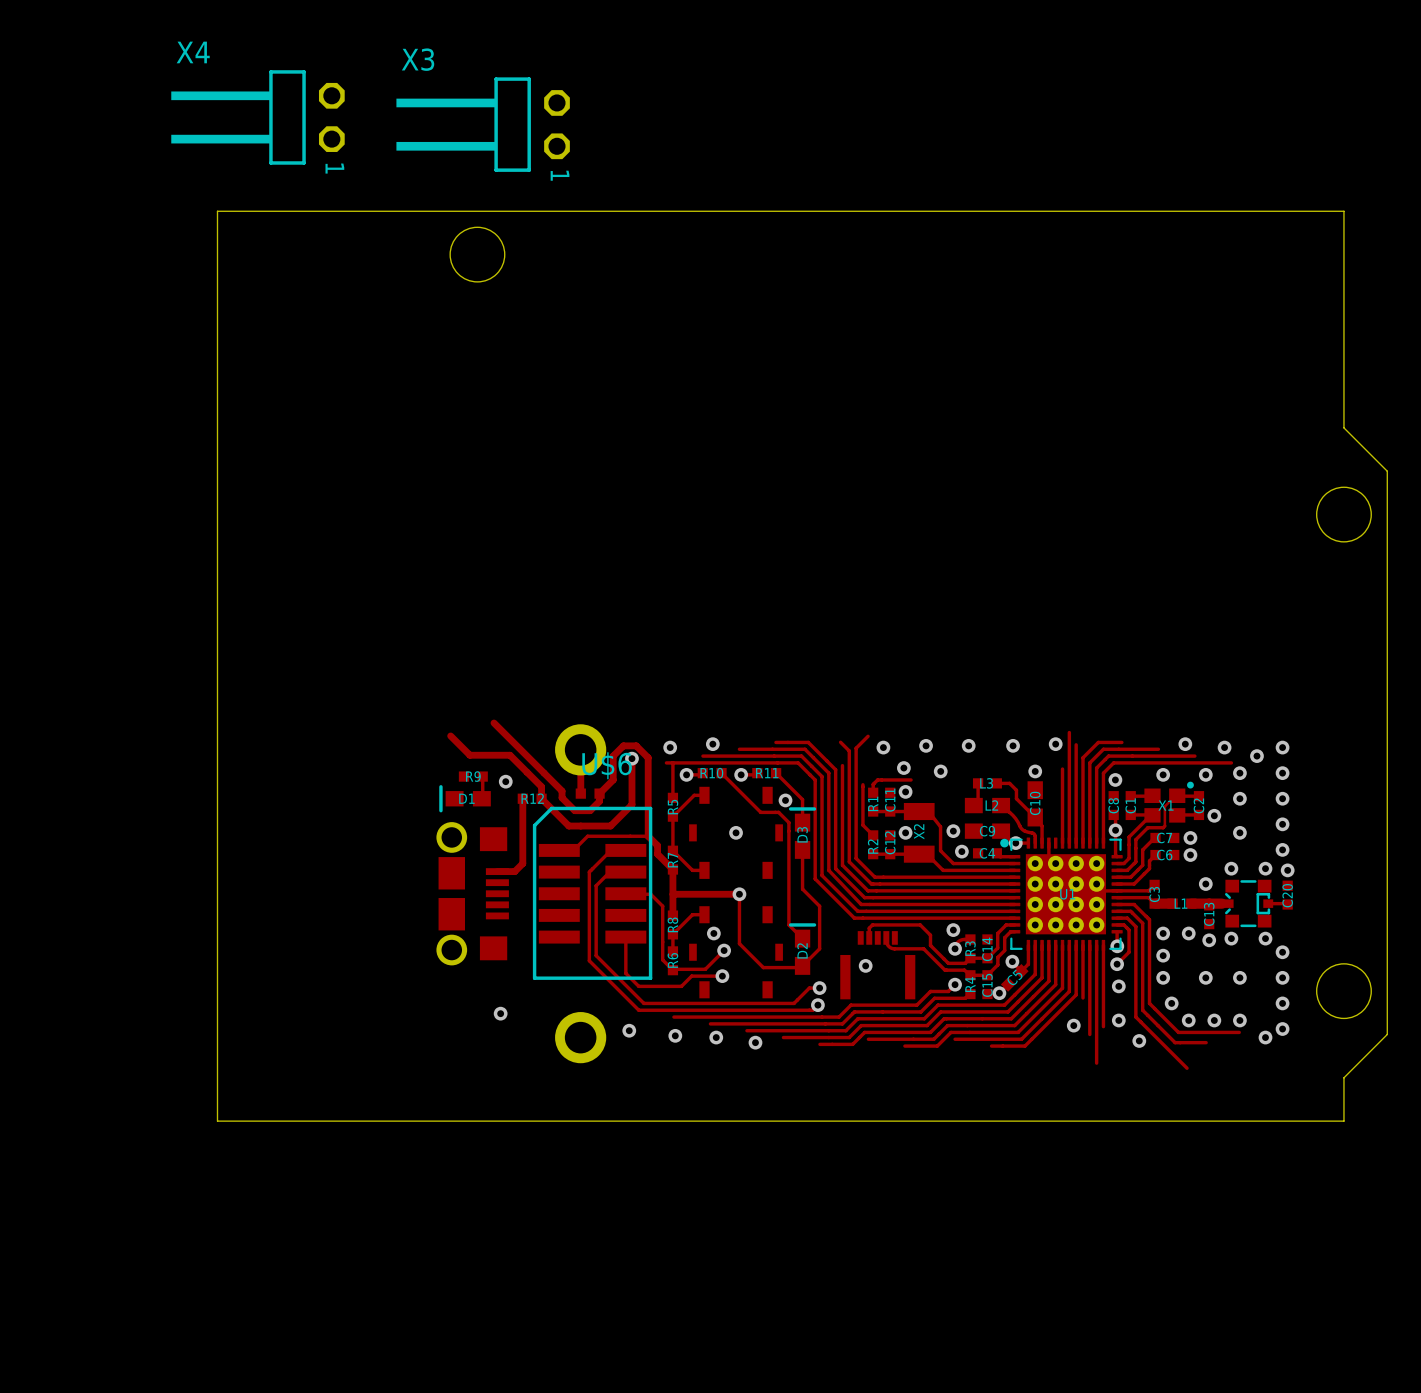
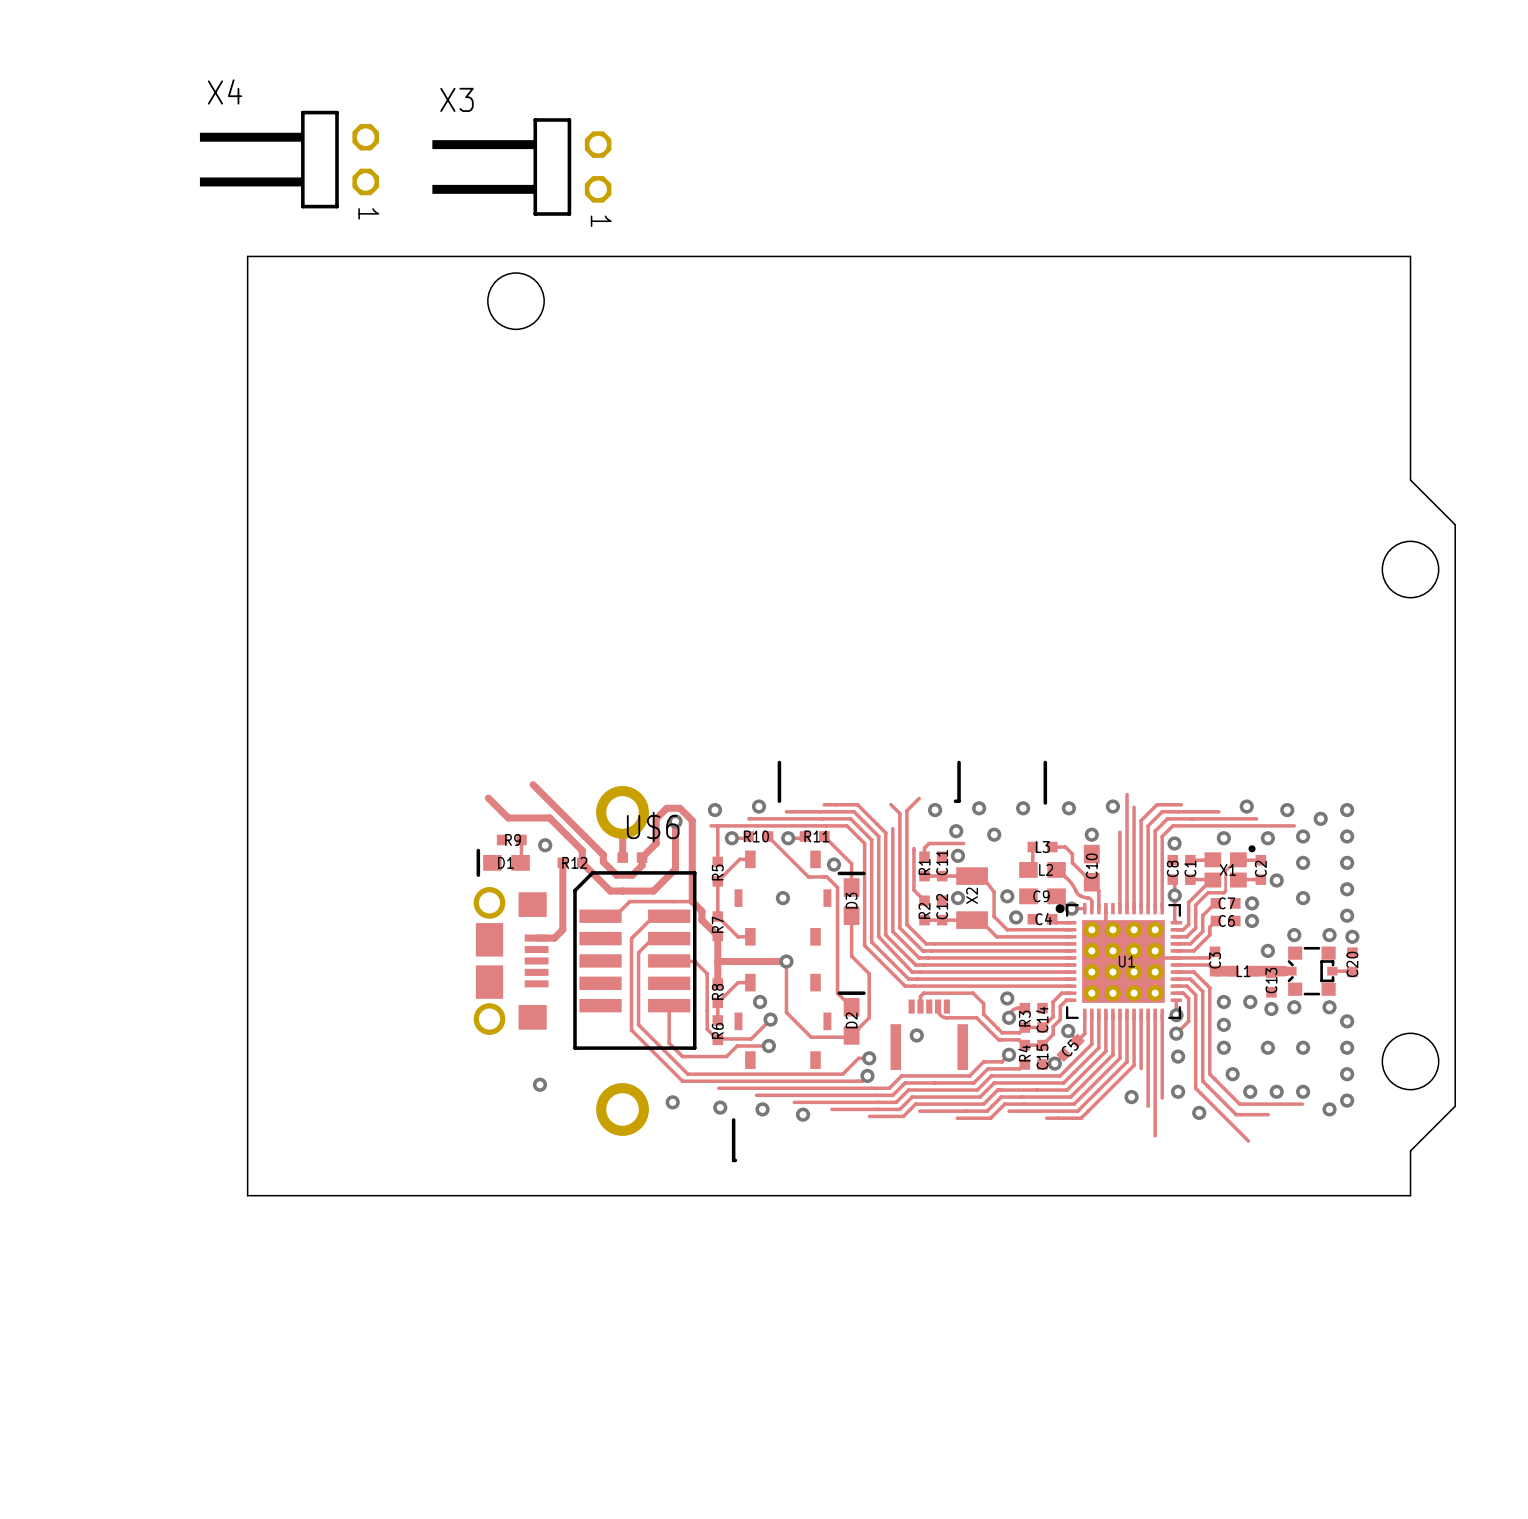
line: none -> (779, 762) (779, 801)
line: none -> (959, 762) (959, 801) (955, 801)
line: none -> (1045, 762) (1045, 803)
line: none -> (733, 1119) (733, 1160) (735, 1160)

